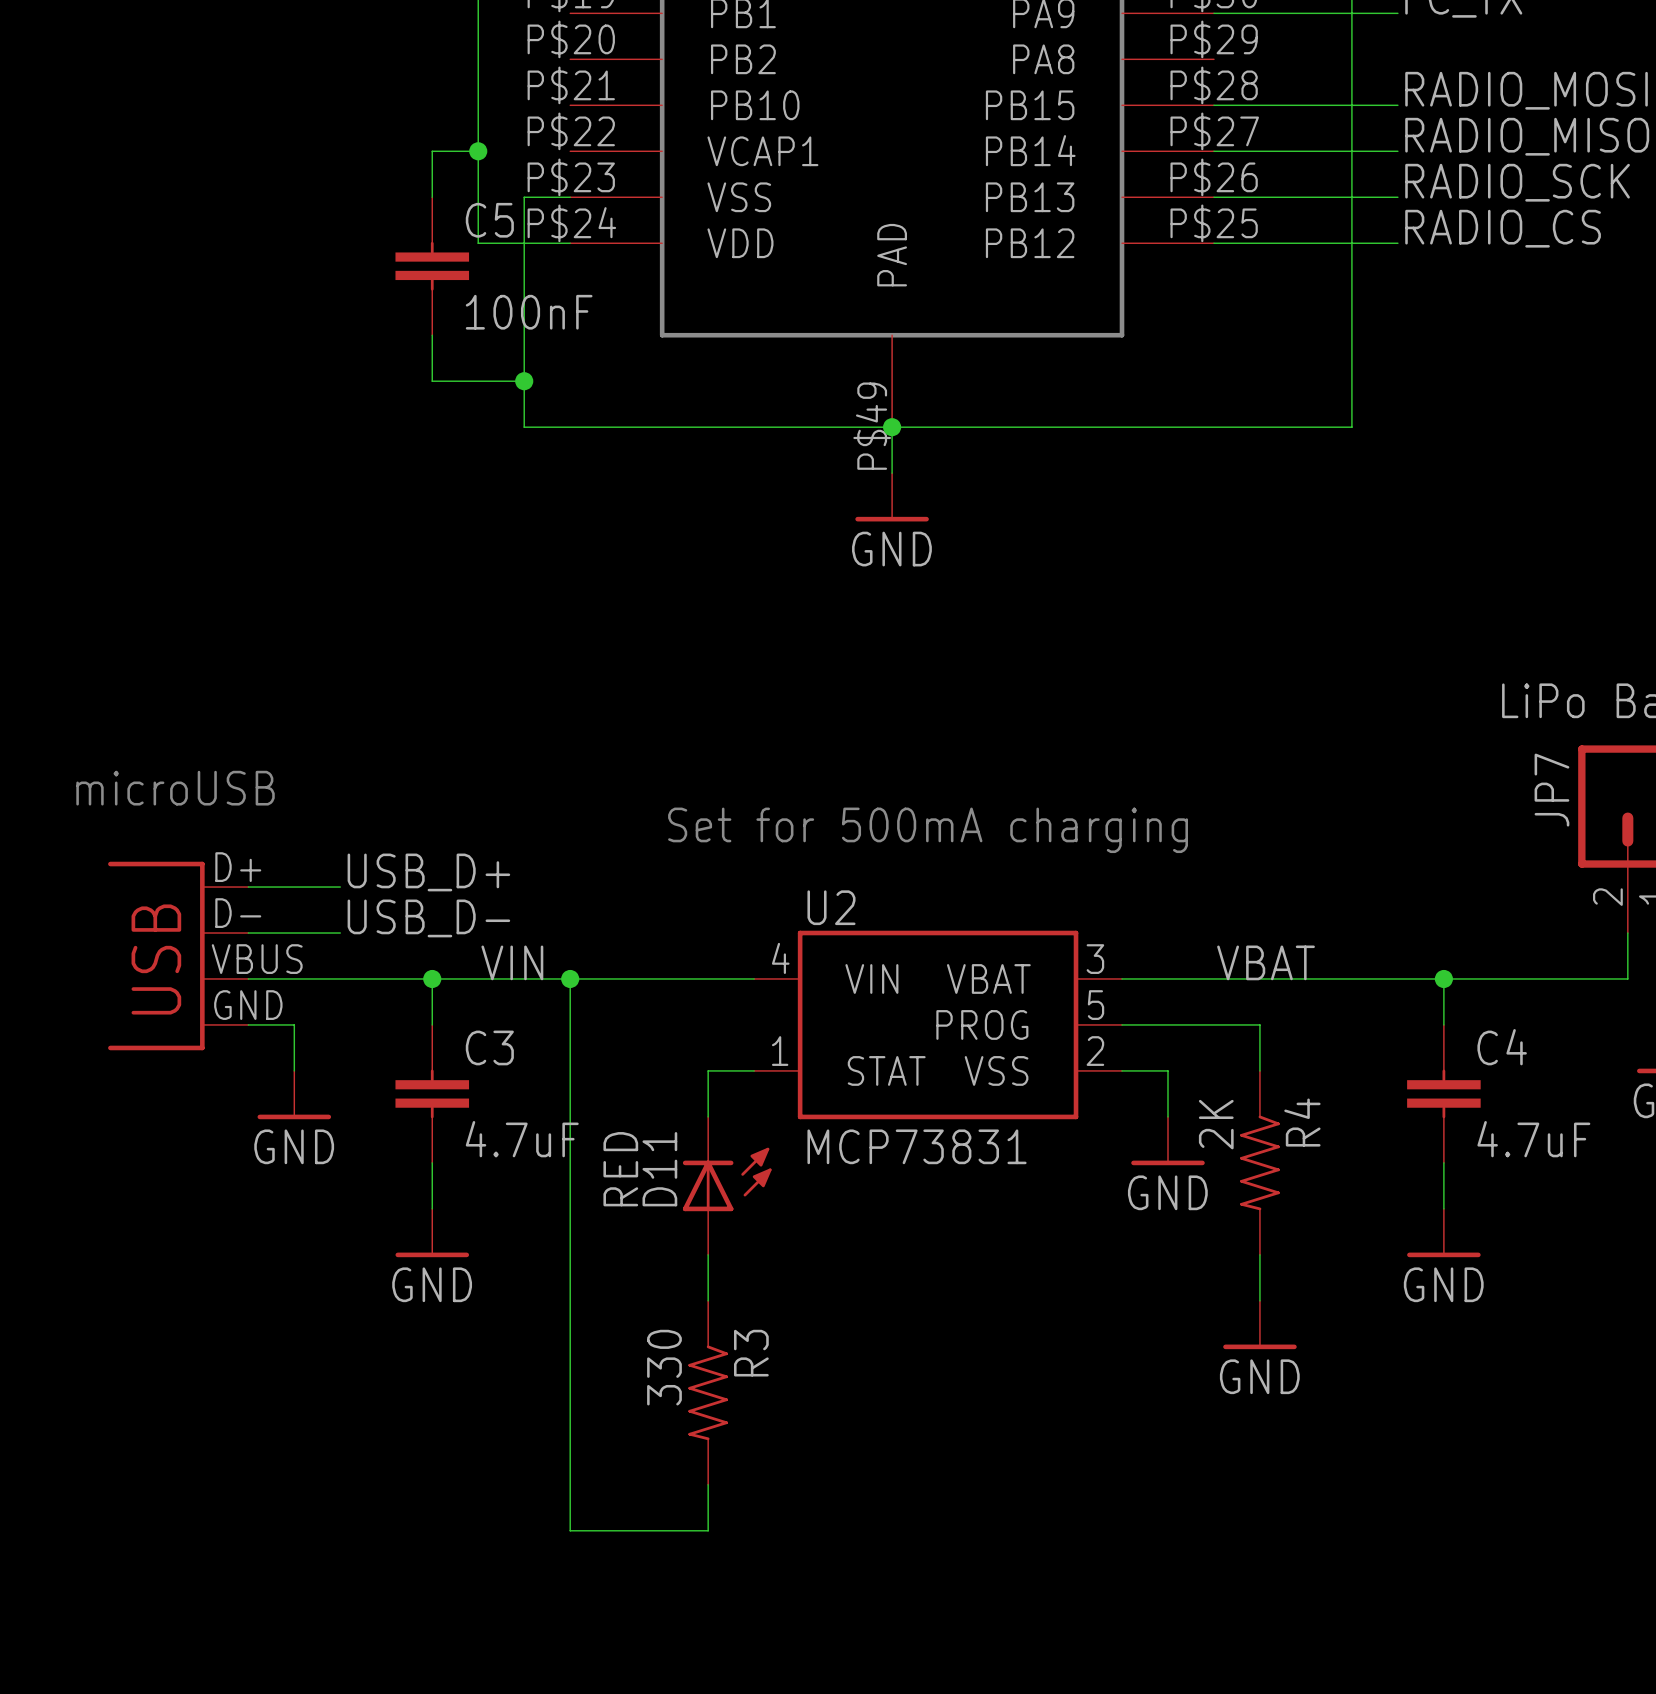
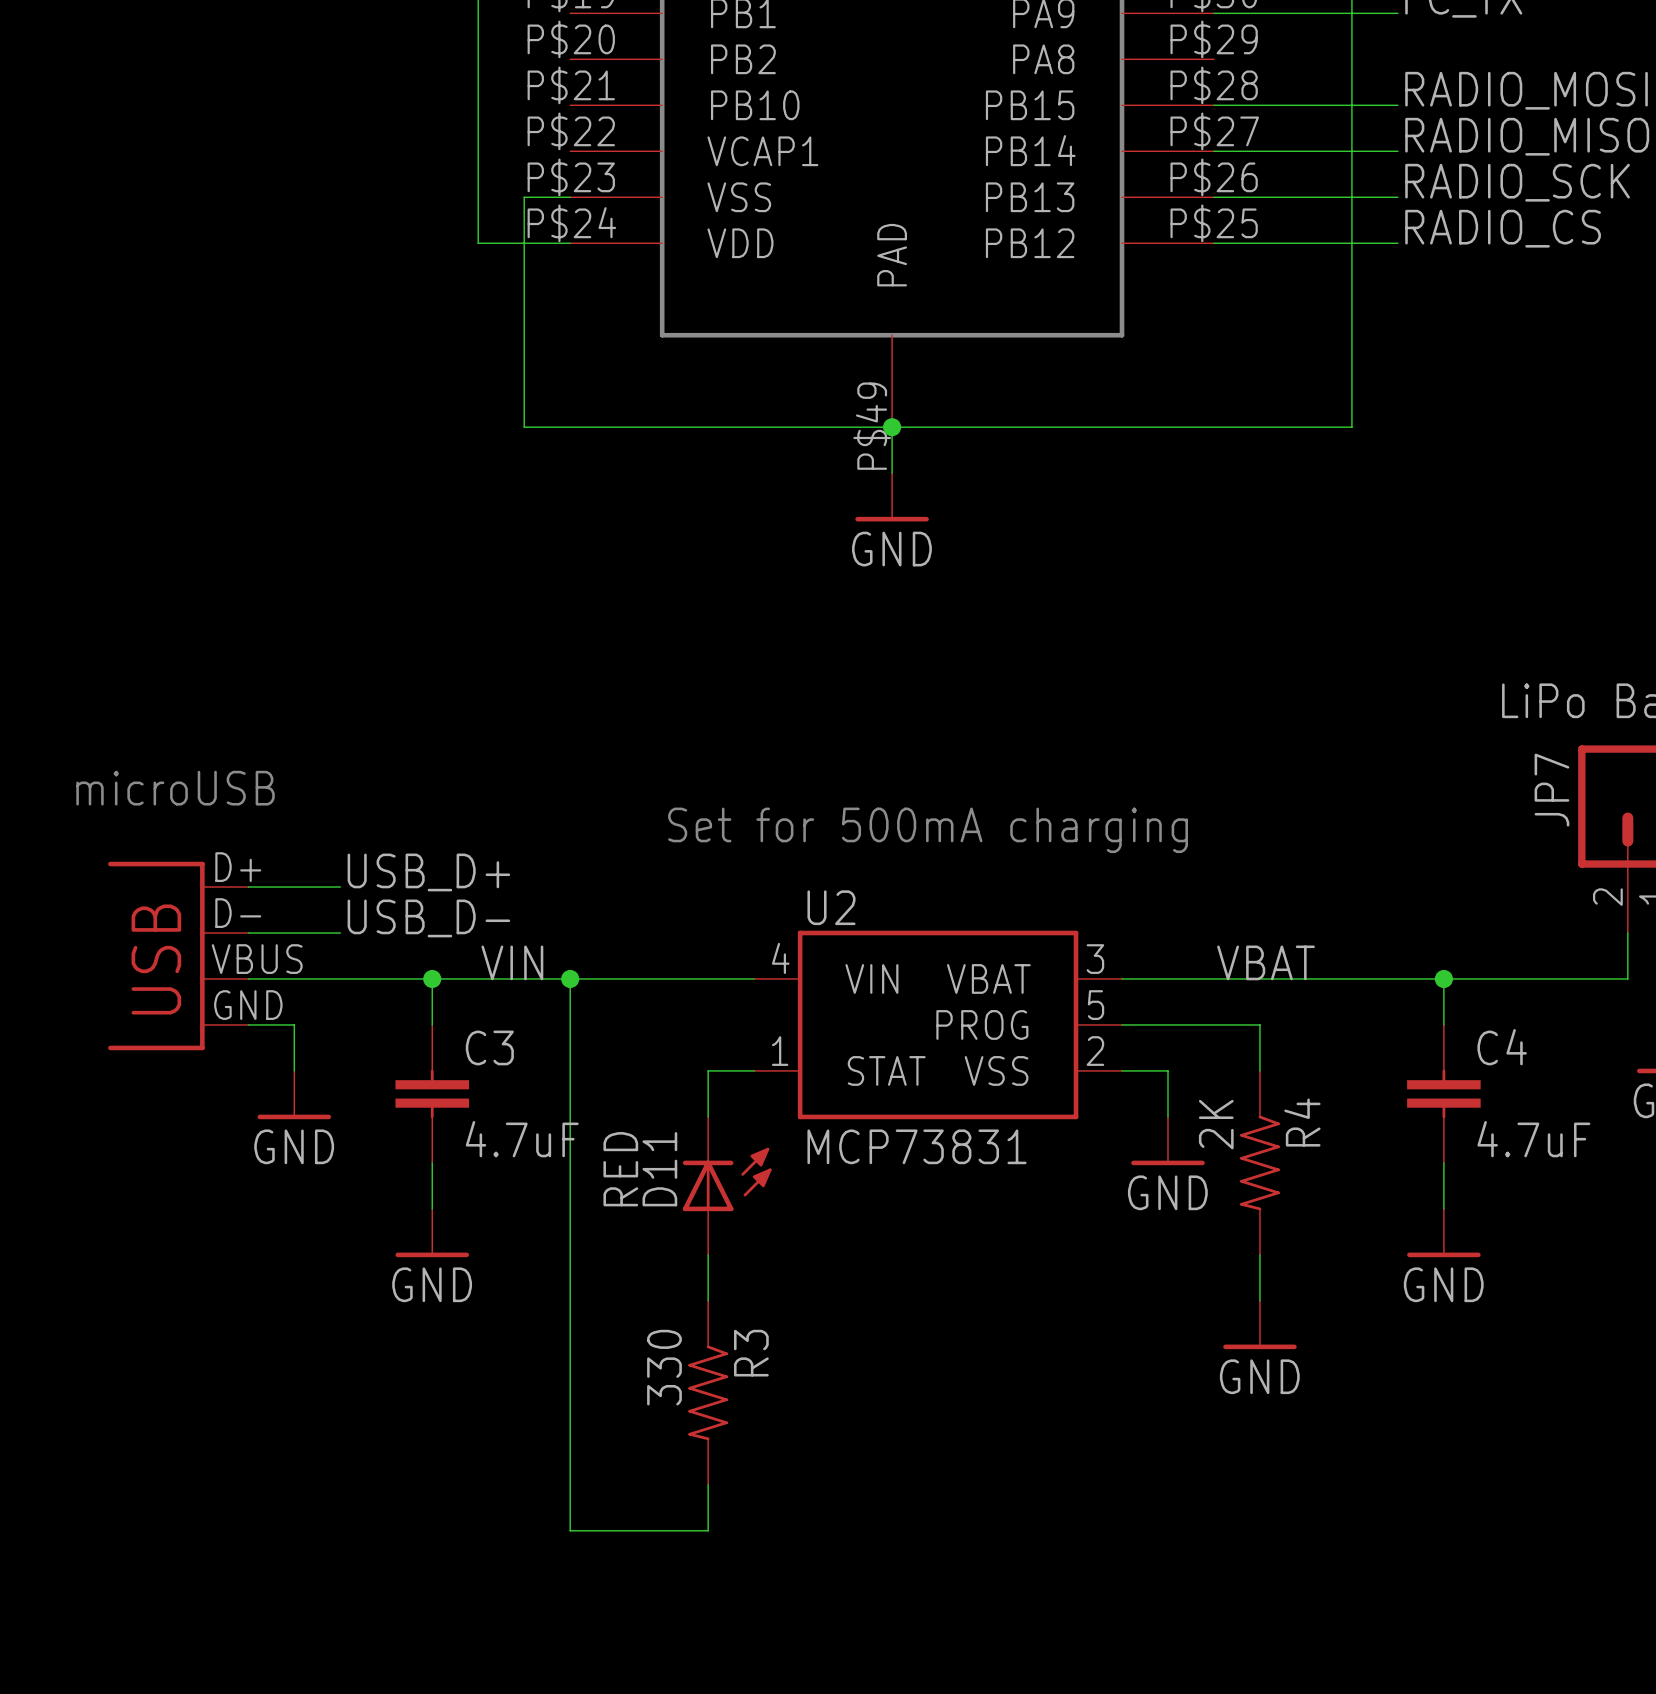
wire: (478, 151) (432, 151) (432, 197) -> none
junction: (478, 151) -> none
C5: 100nF (432, 266) -> none
wire: (432, 335) (432, 381) (524, 381) -> none
junction: (524, 381) -> none

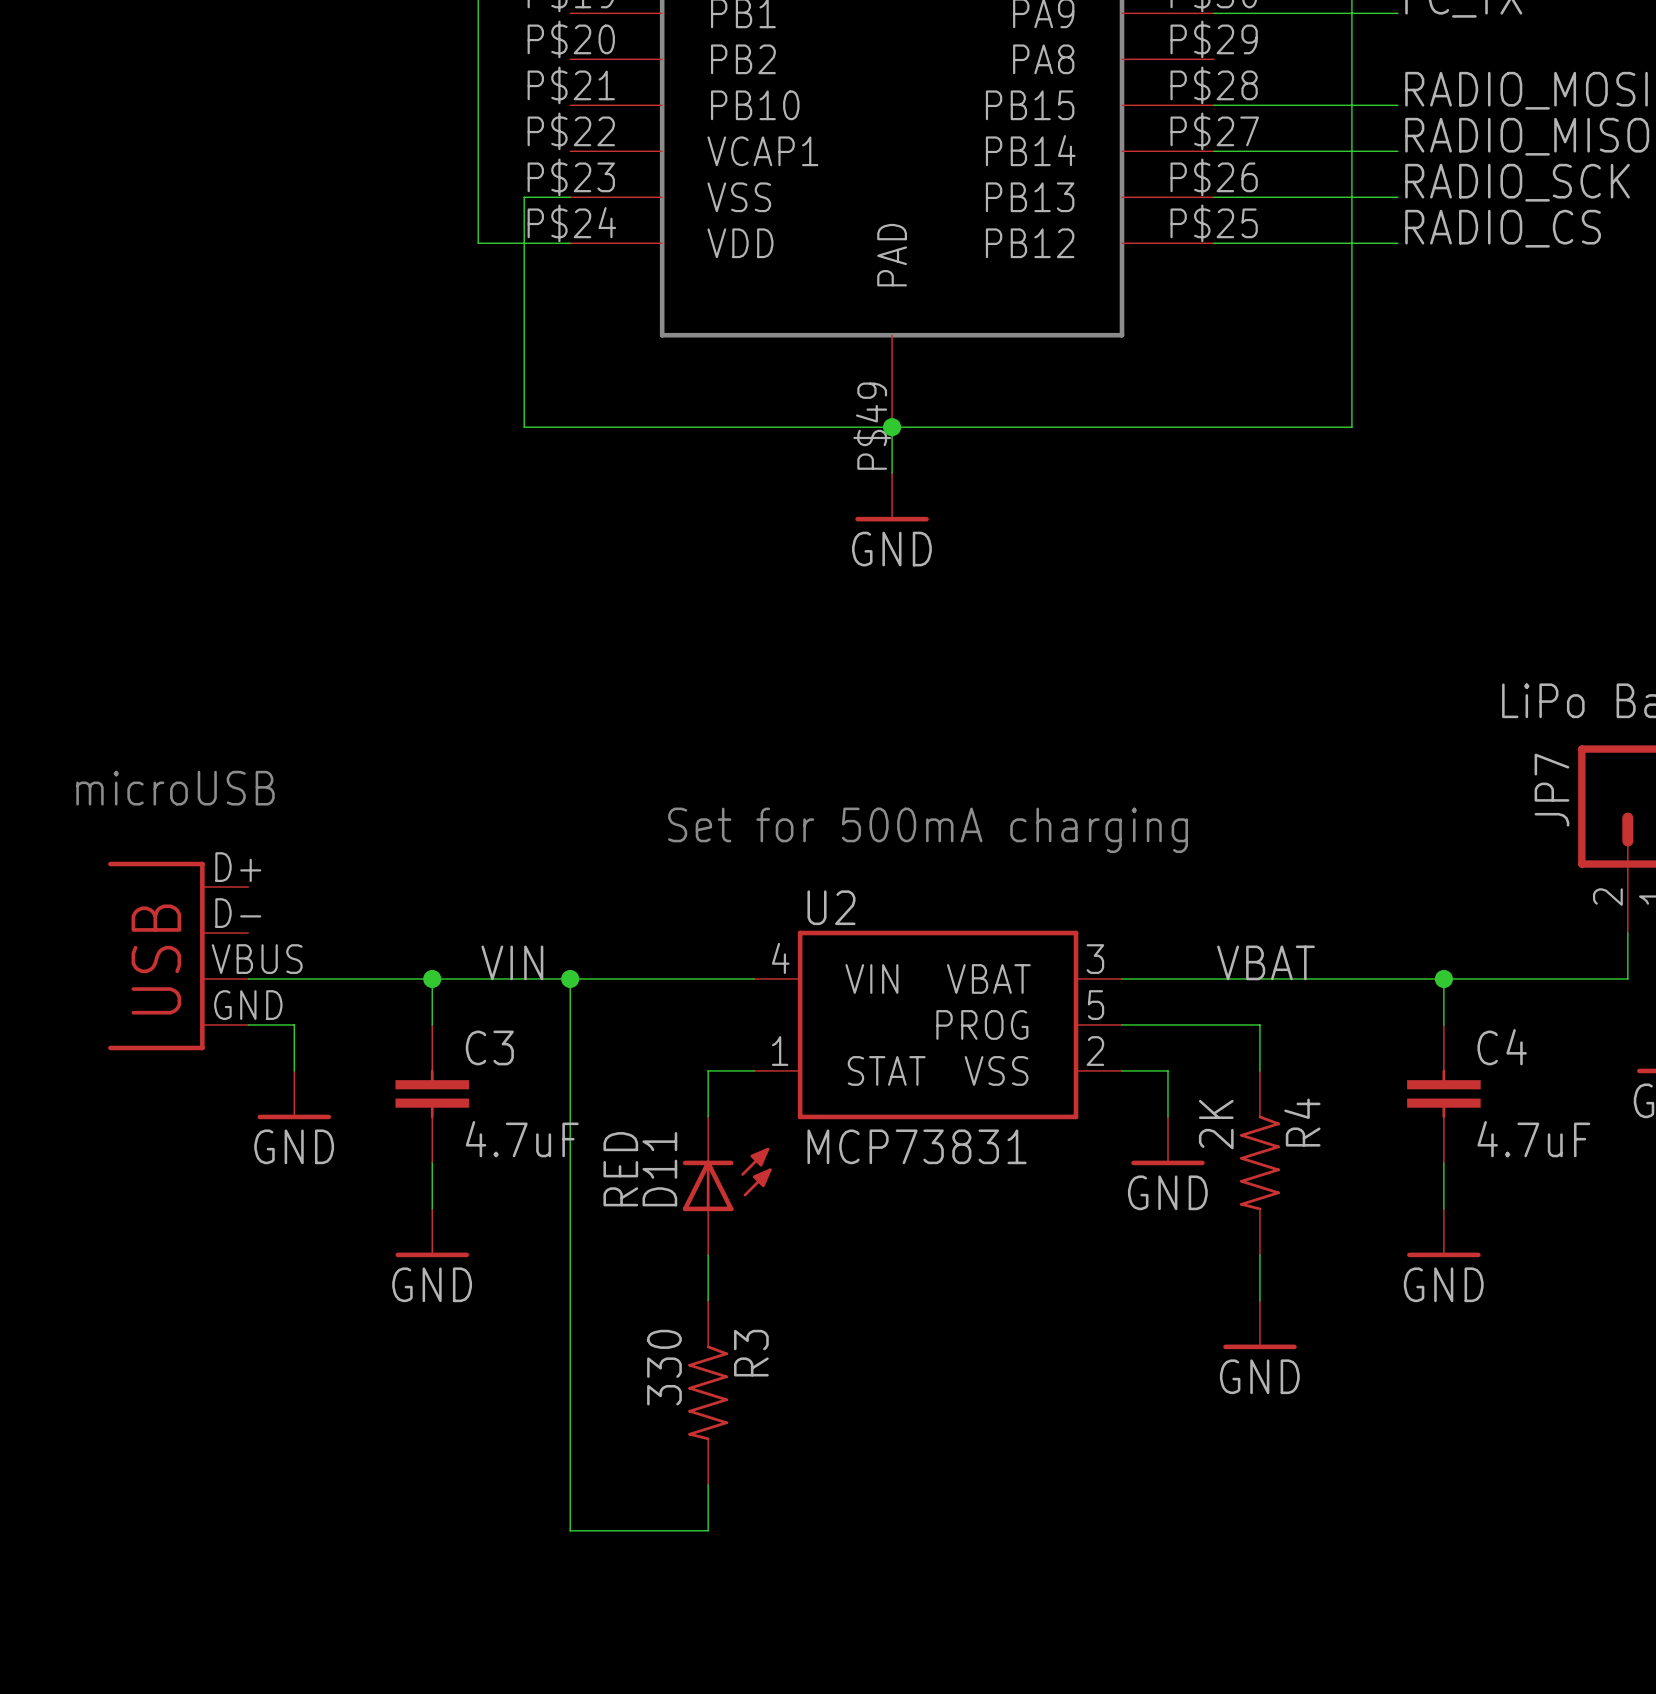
label: USB_D+ (428, 872) -> none
wire: (248, 887) (340, 887) -> none
label: USB_D- (428, 918) -> none
wire: (248, 933) (340, 933) -> none

